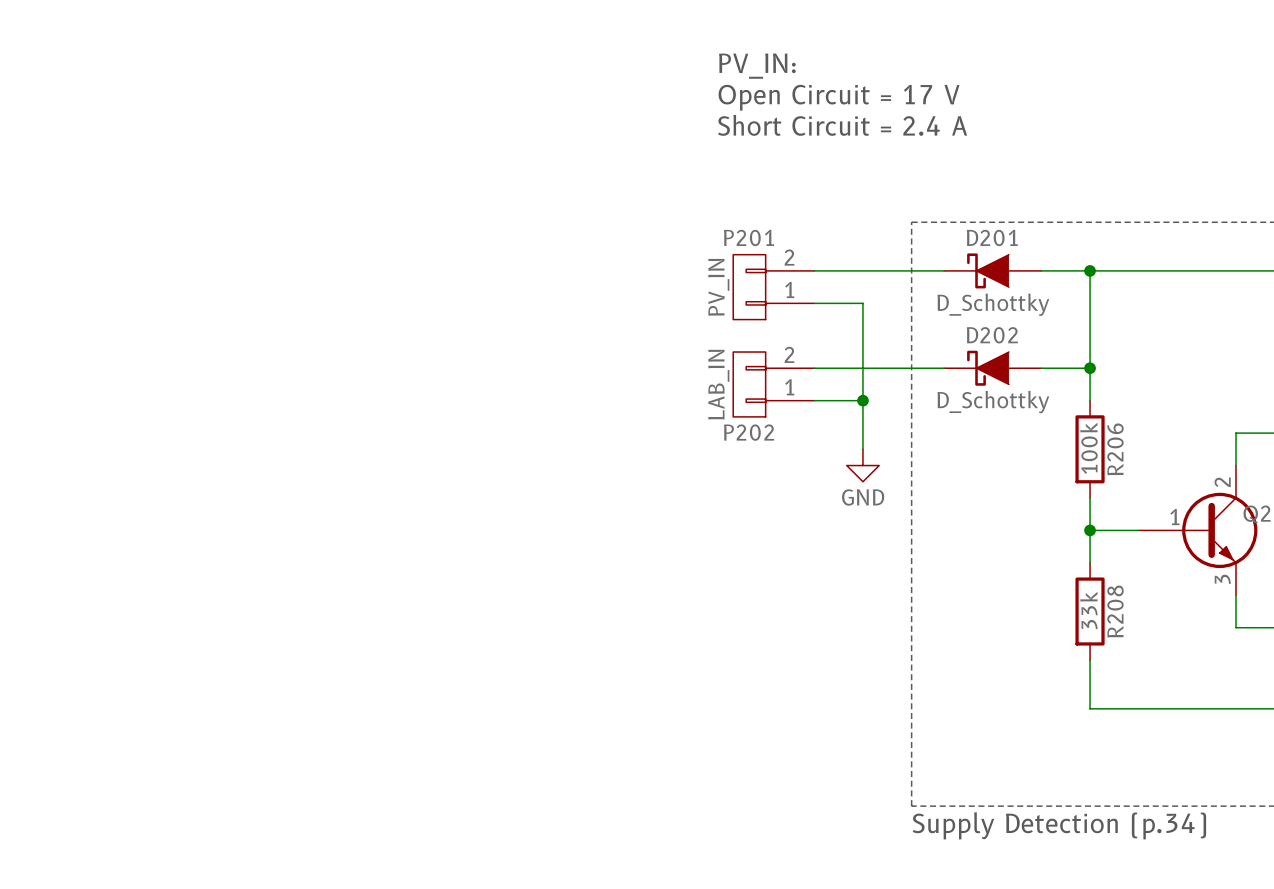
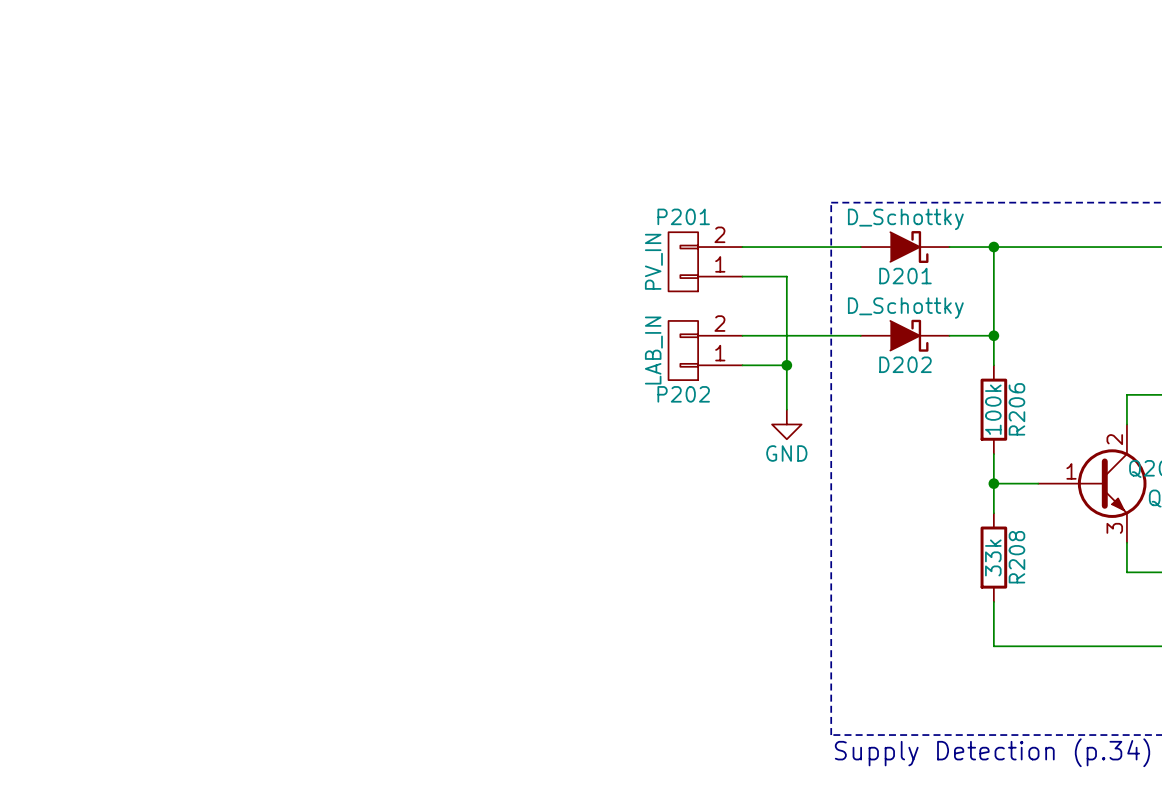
text: PV_IN: (757, 66) -> none
text: Open Circuit = 17 V (839, 97) -> none
text: Short Circuit = 2.4 A (842, 125) -> none
D201 rotation: 0° (988, 270) -> 180° (909, 247)
D202 rotation: 0° (988, 368) -> 180° (909, 335)

